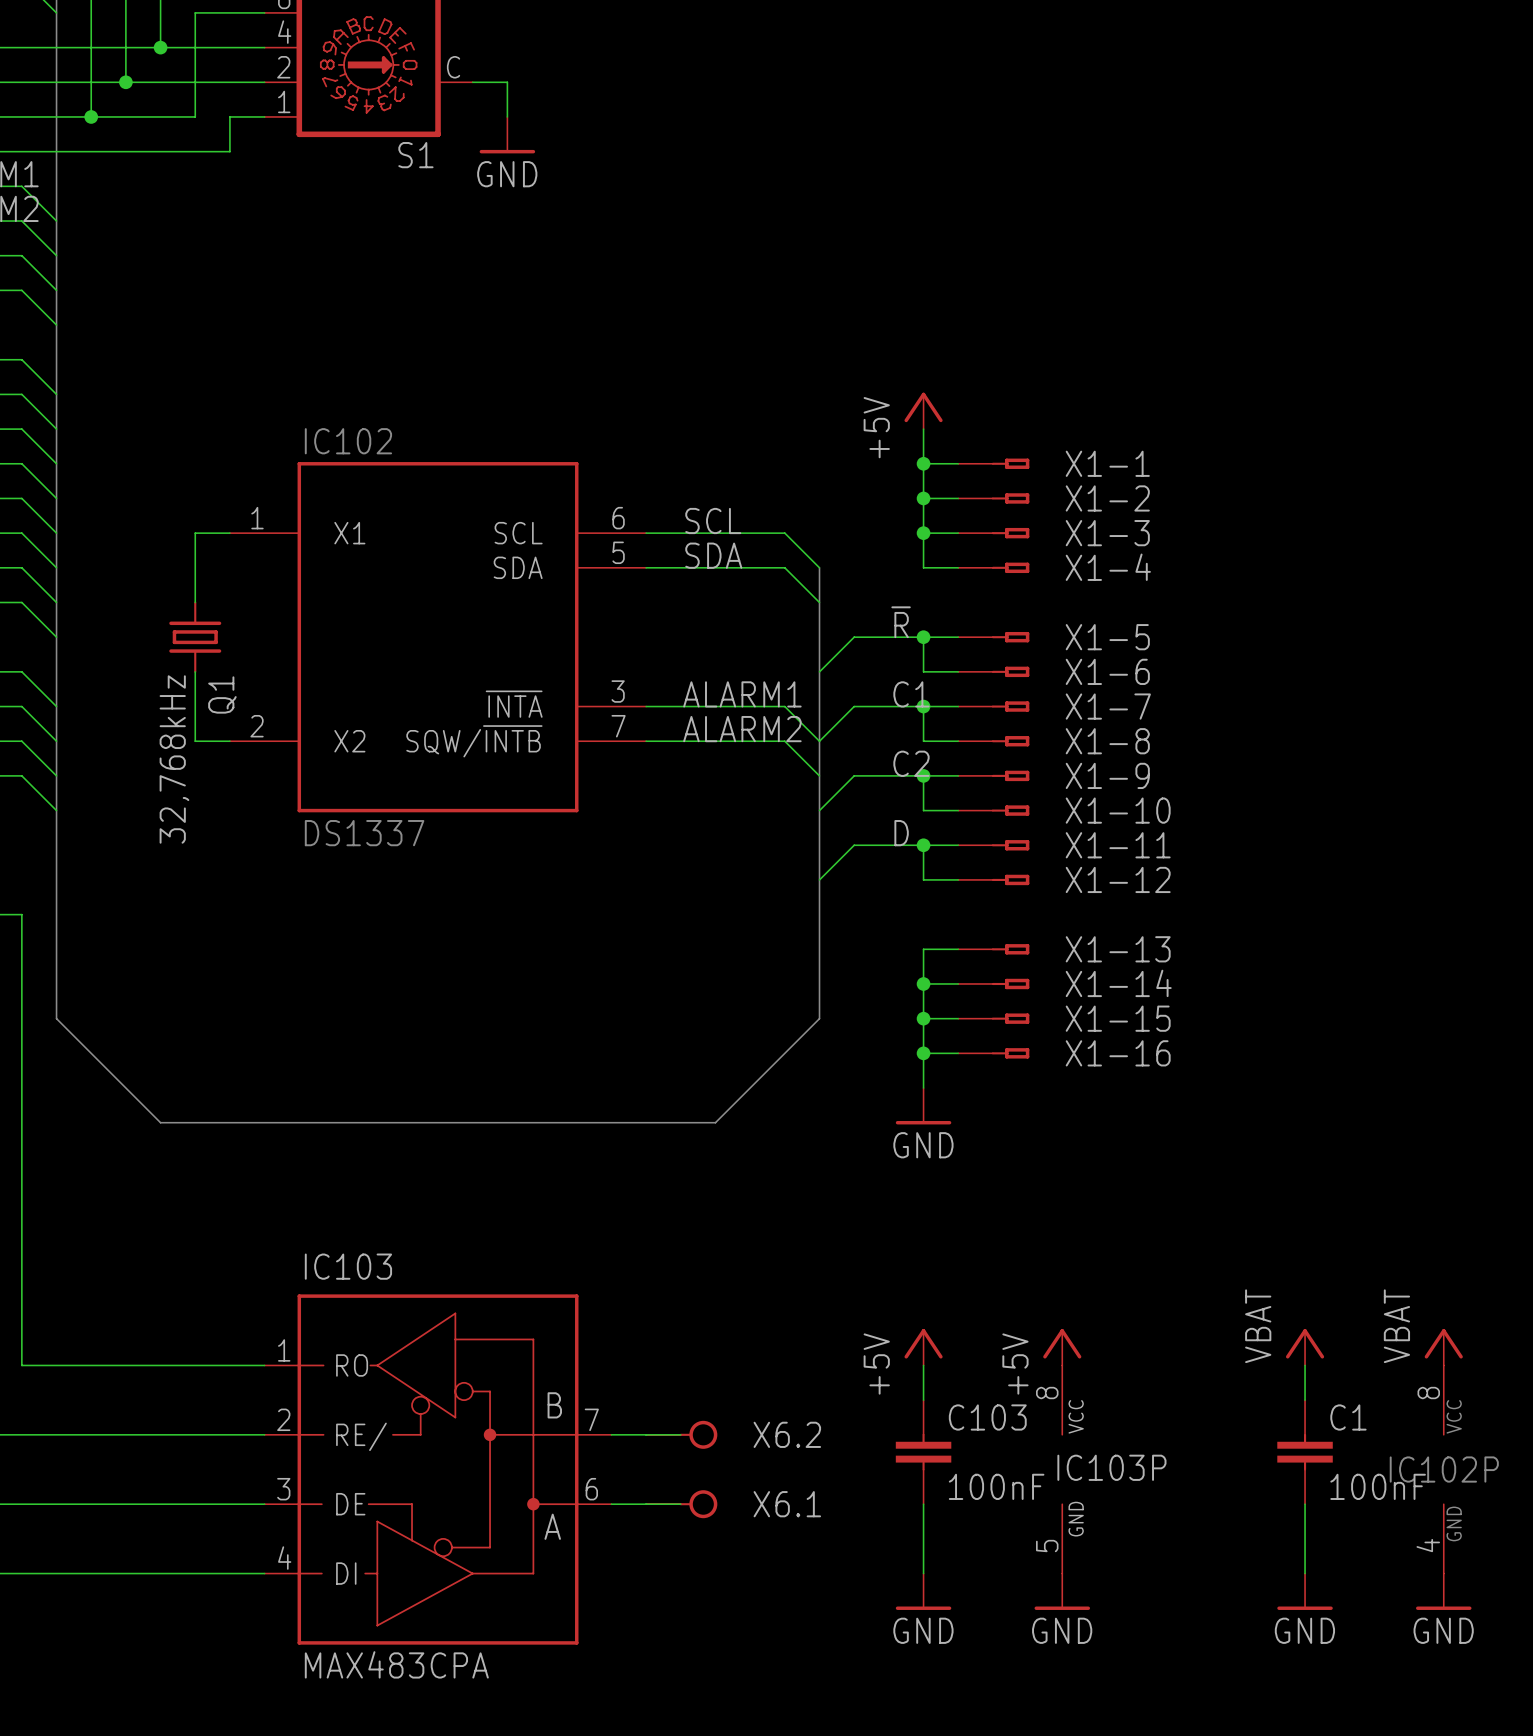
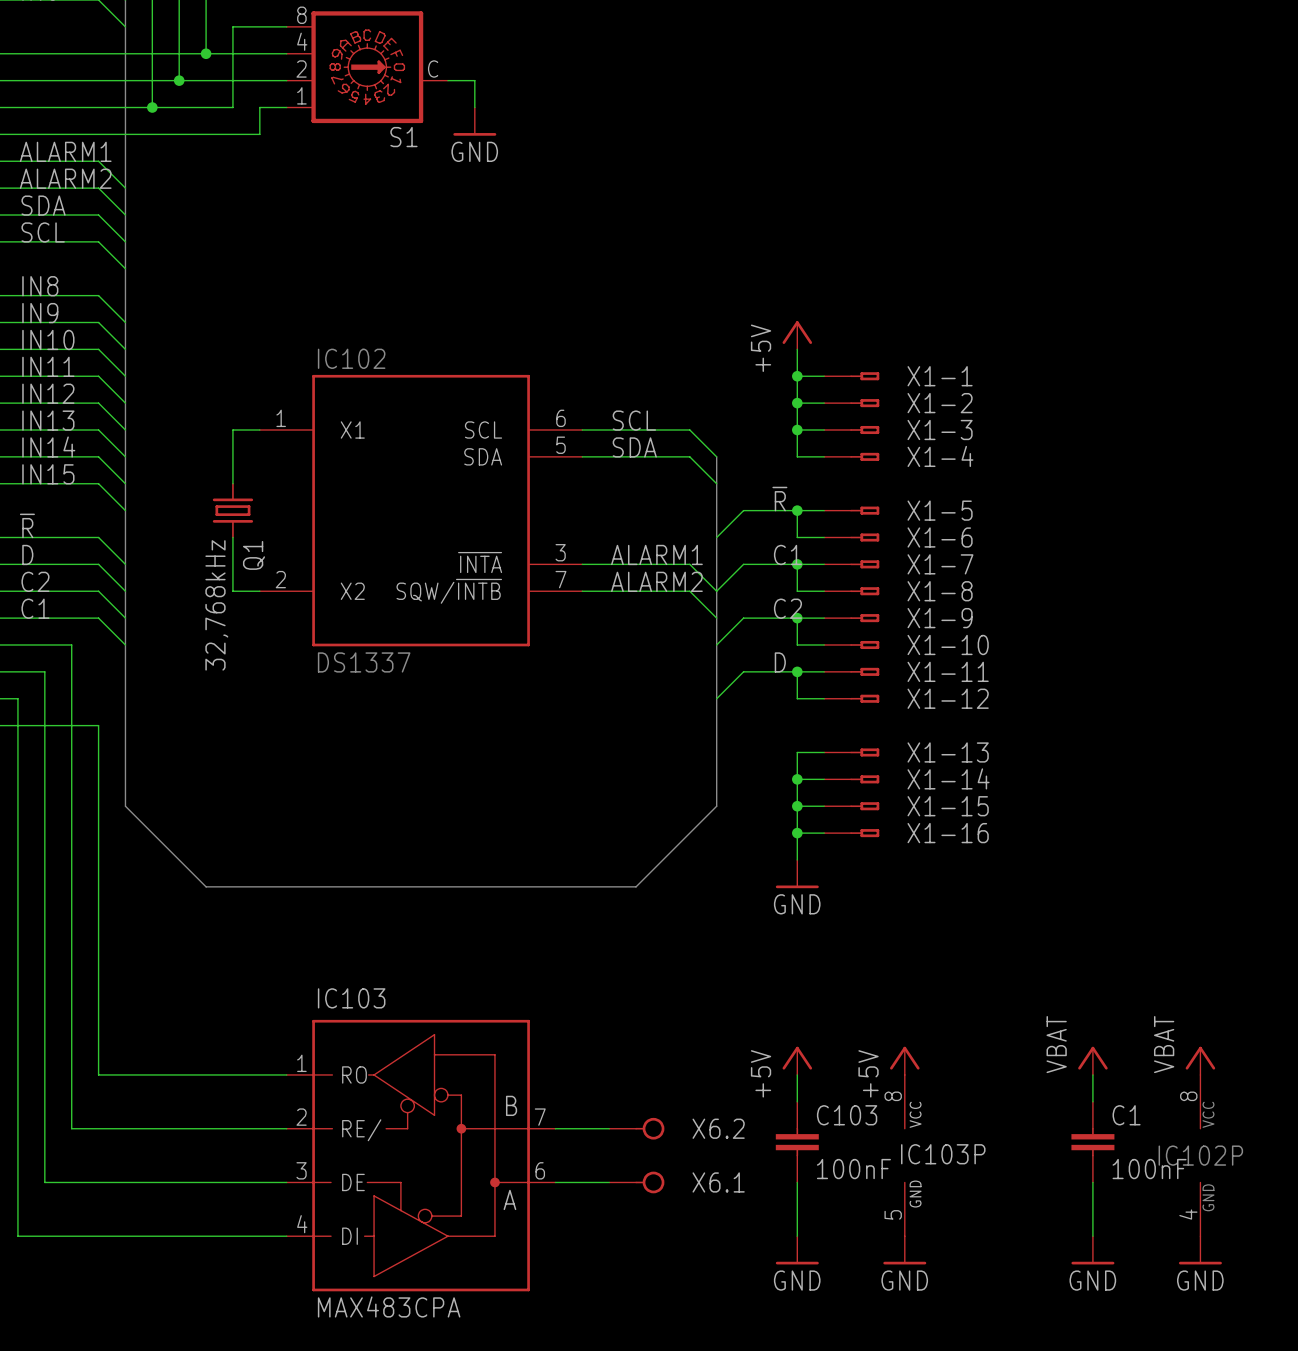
X6.2 position: (681, 1434) -> (636, 1128)
X6.1 position: (681, 1504) -> (636, 1182)

